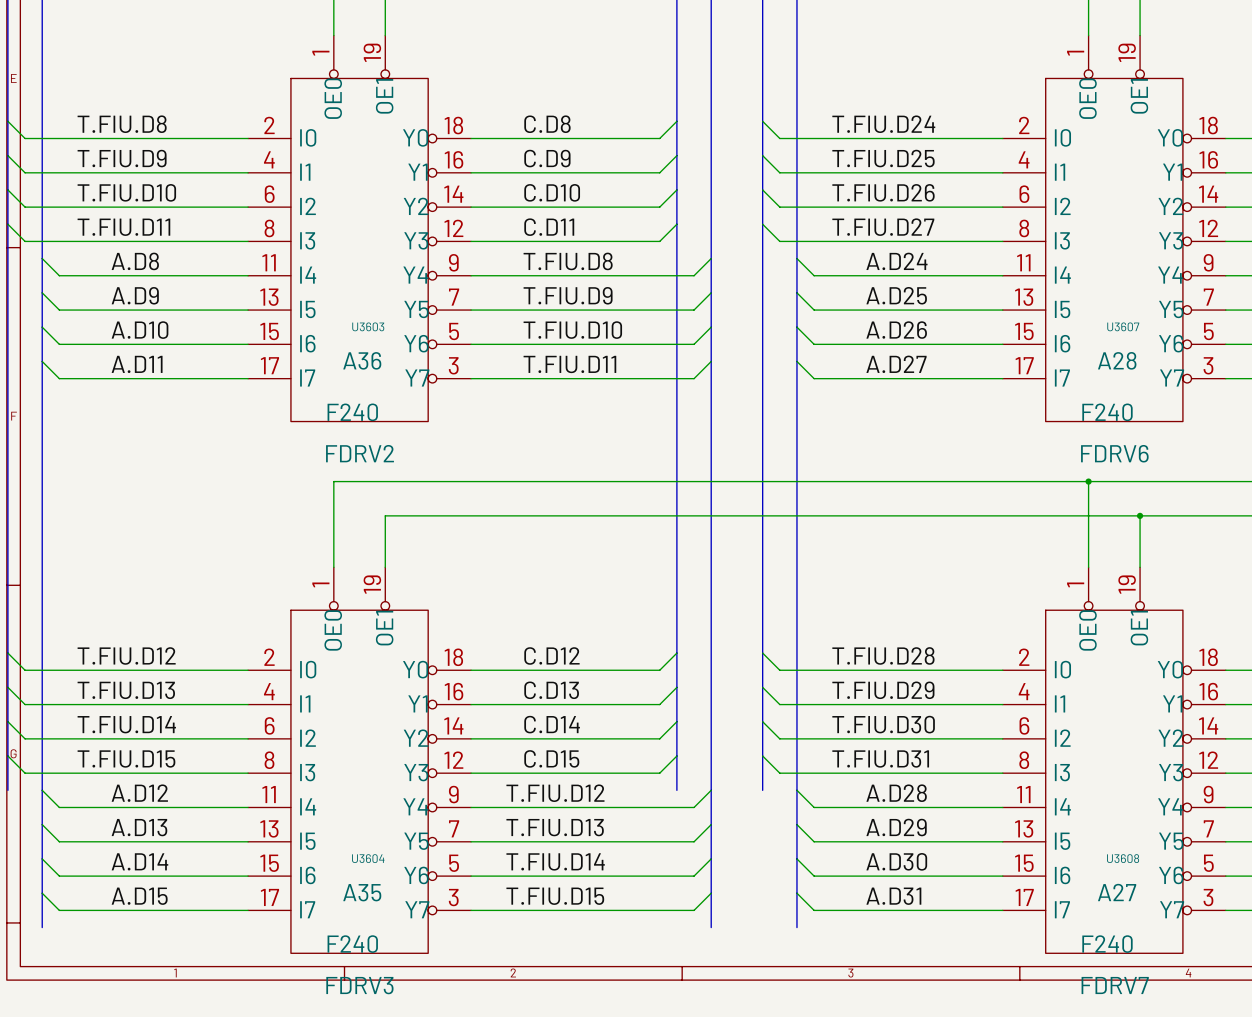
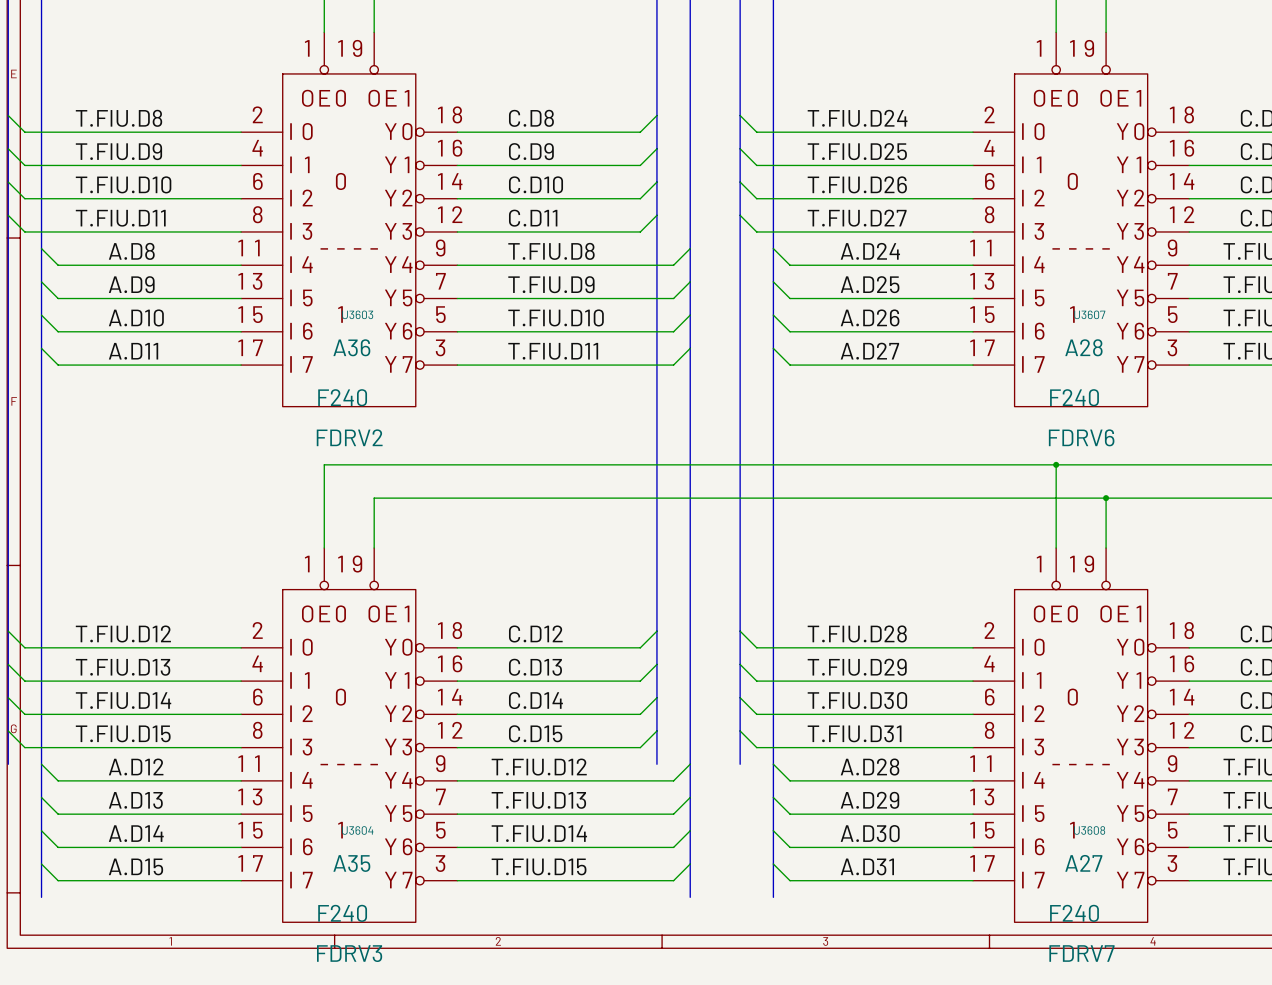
U3603 symbol: [248, 35, 472, 422] -> [241, 32, 458, 407]
U3607 symbol: [1002, 35, 1226, 422] -> [973, 32, 1190, 407]
U3604 symbol: [248, 567, 472, 954] -> [241, 548, 458, 923]
U3608 symbol: [1002, 567, 1226, 954] -> [973, 548, 1190, 923]

